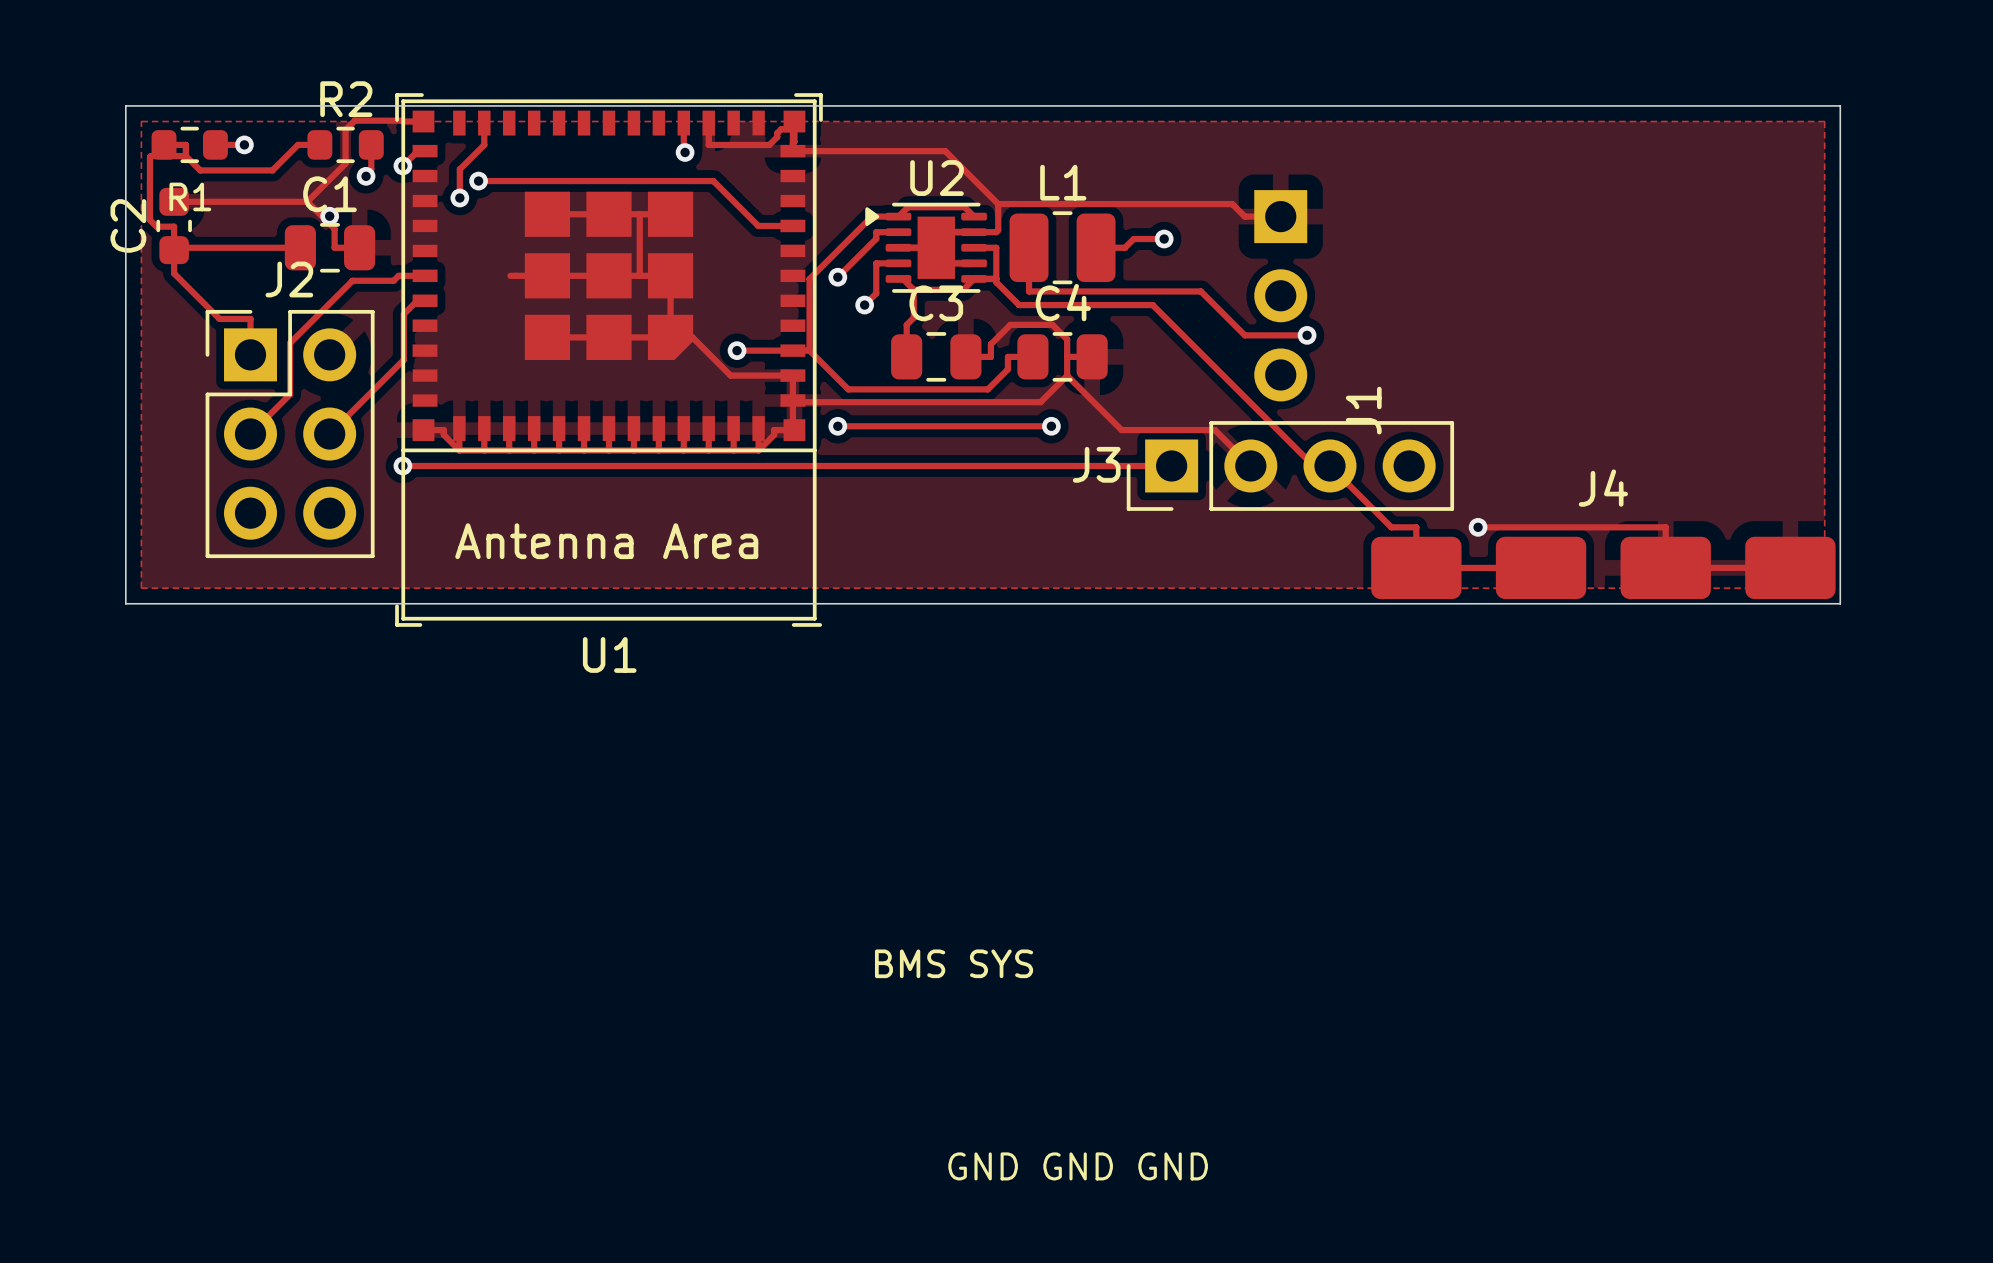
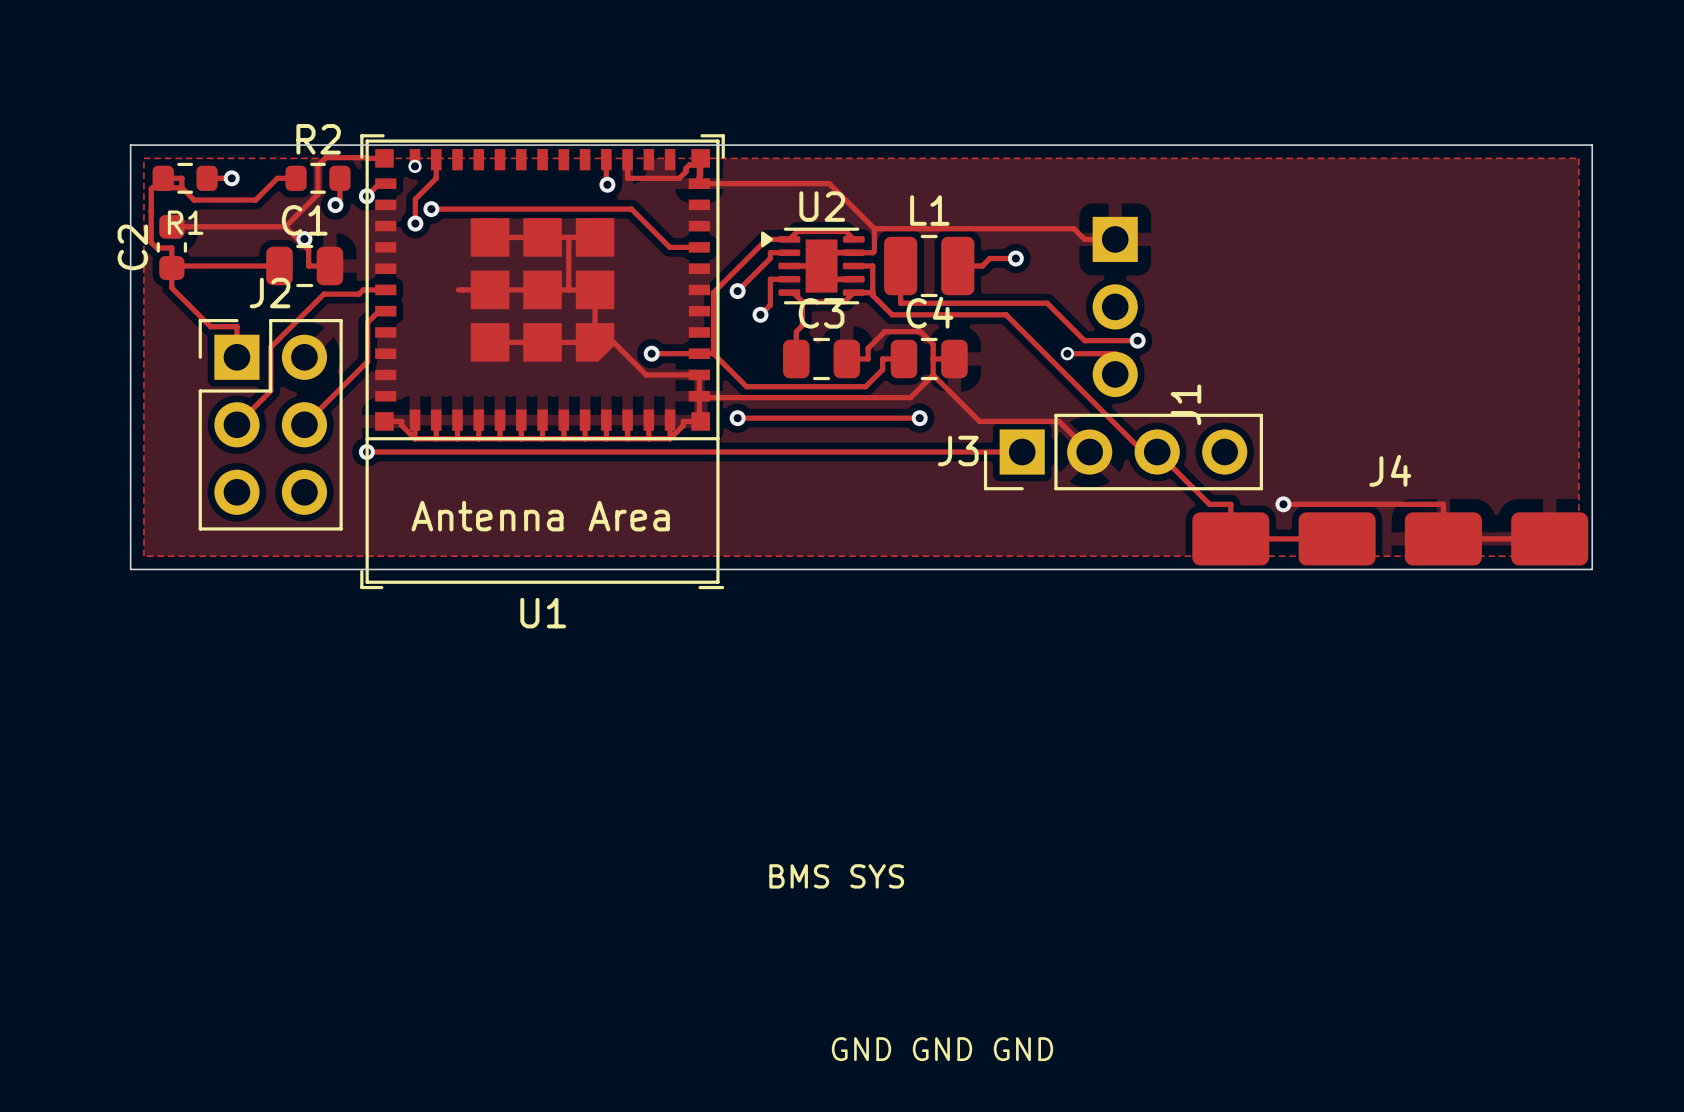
via: none -> (415, 166)
track: none -> (1067, 353) (1115, 353) (1115, 374)
via: none -> (1067, 353)

